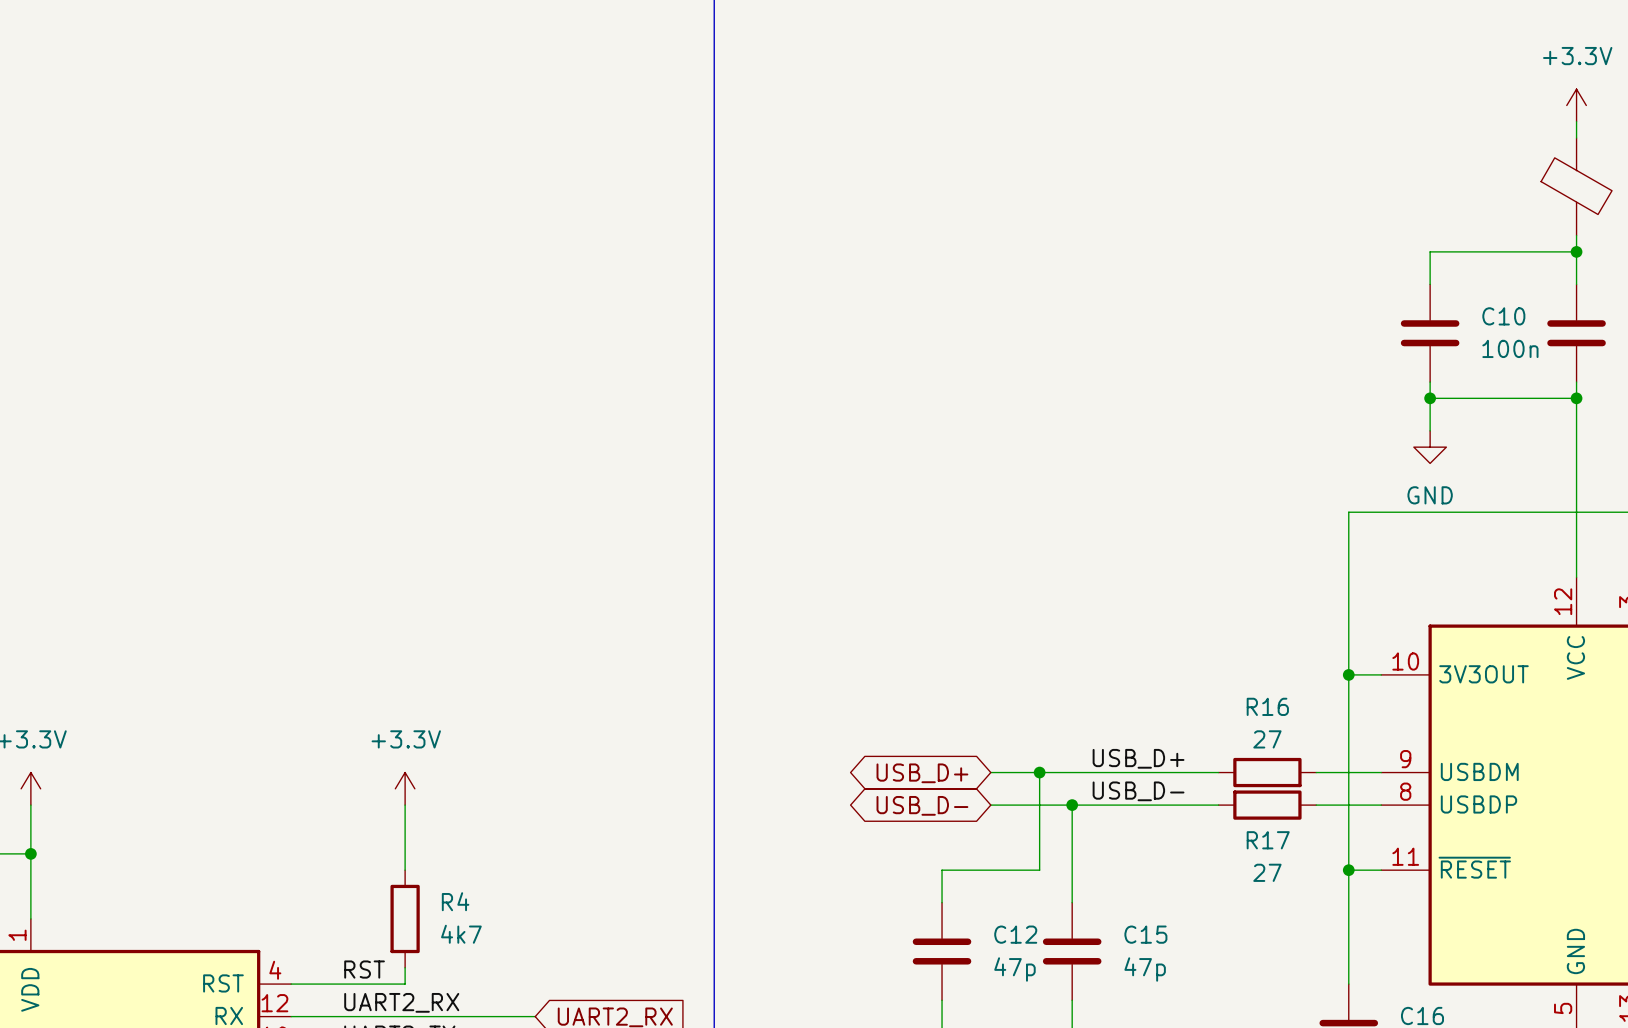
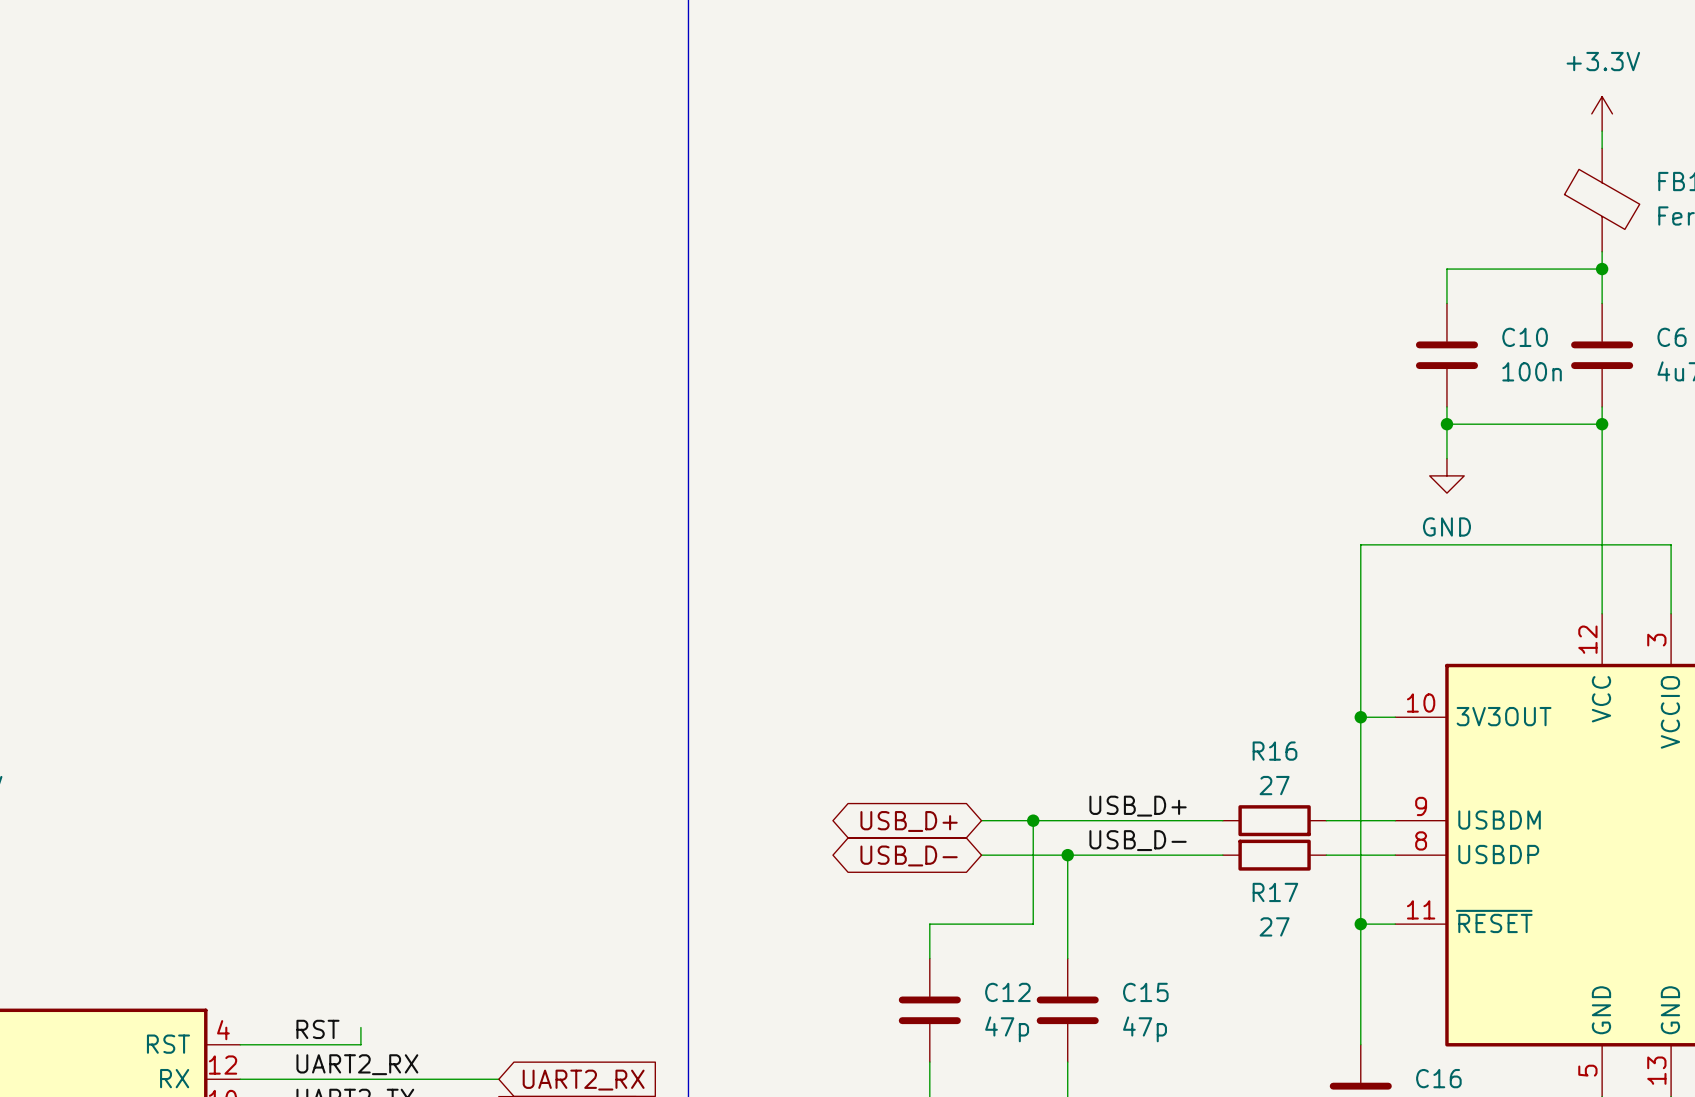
power symbol: +3.3V (405, 788) -> none
wire: (405, 805) (405, 870) -> none
R4: 4k7 (405, 918) -> none

